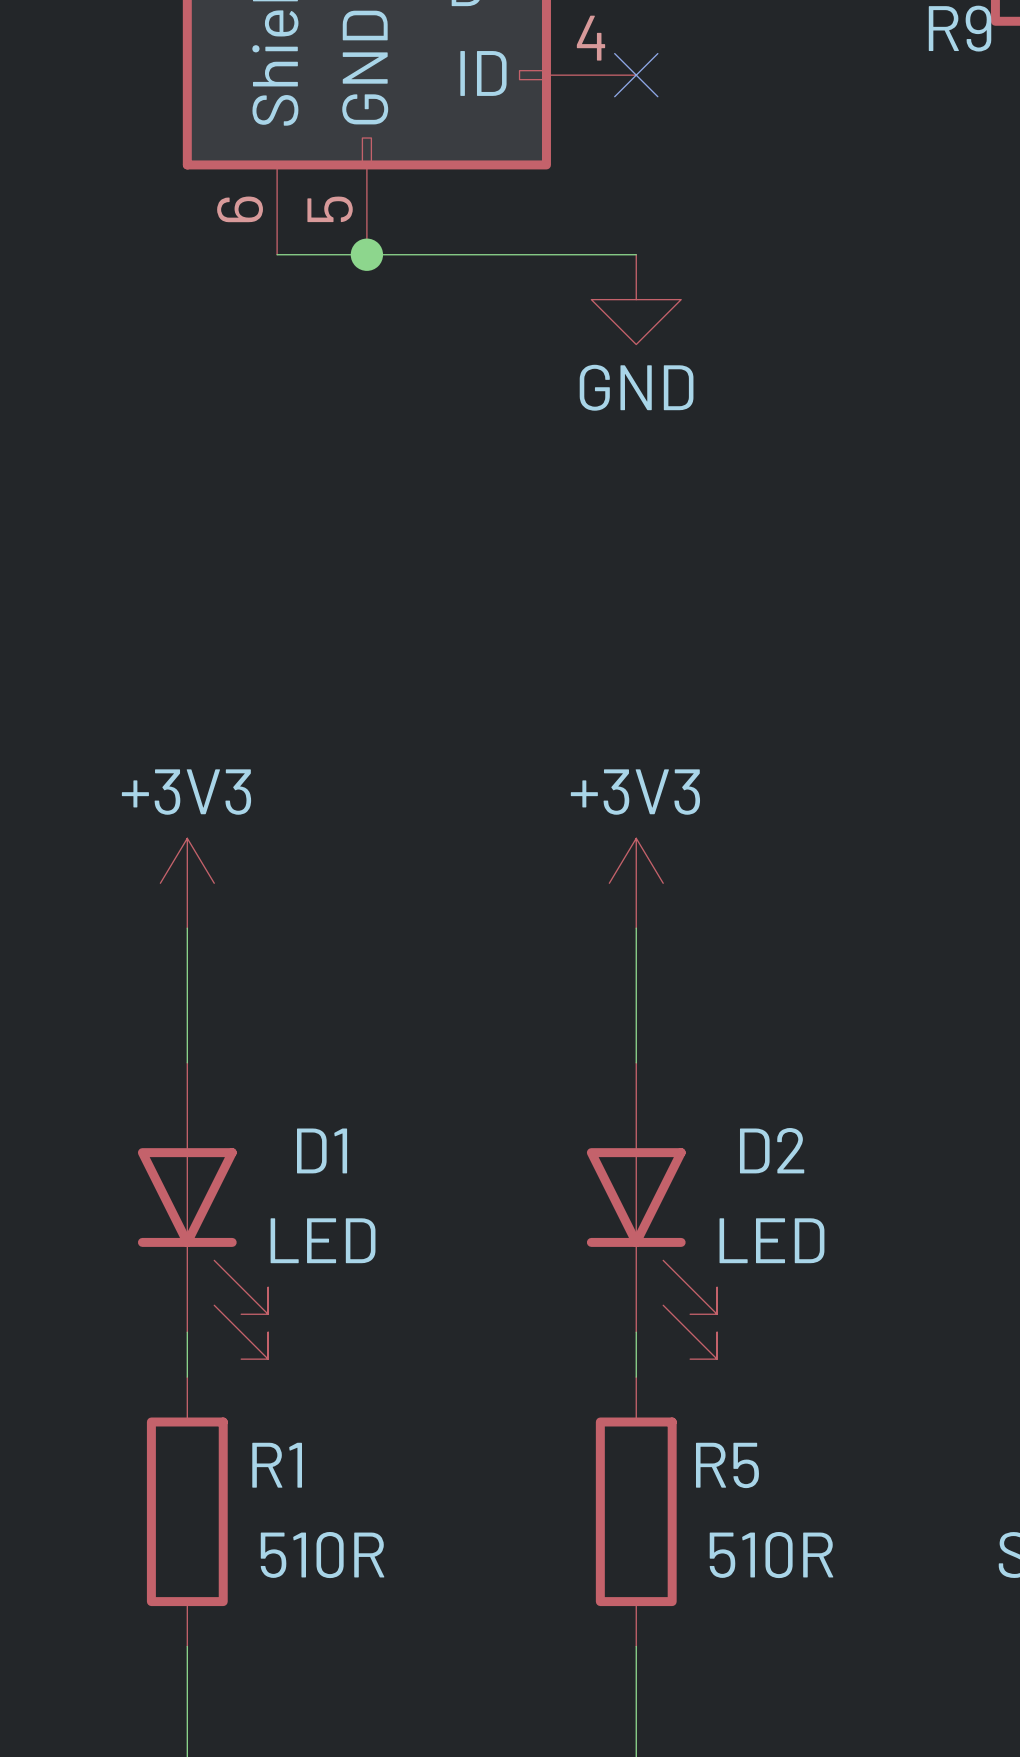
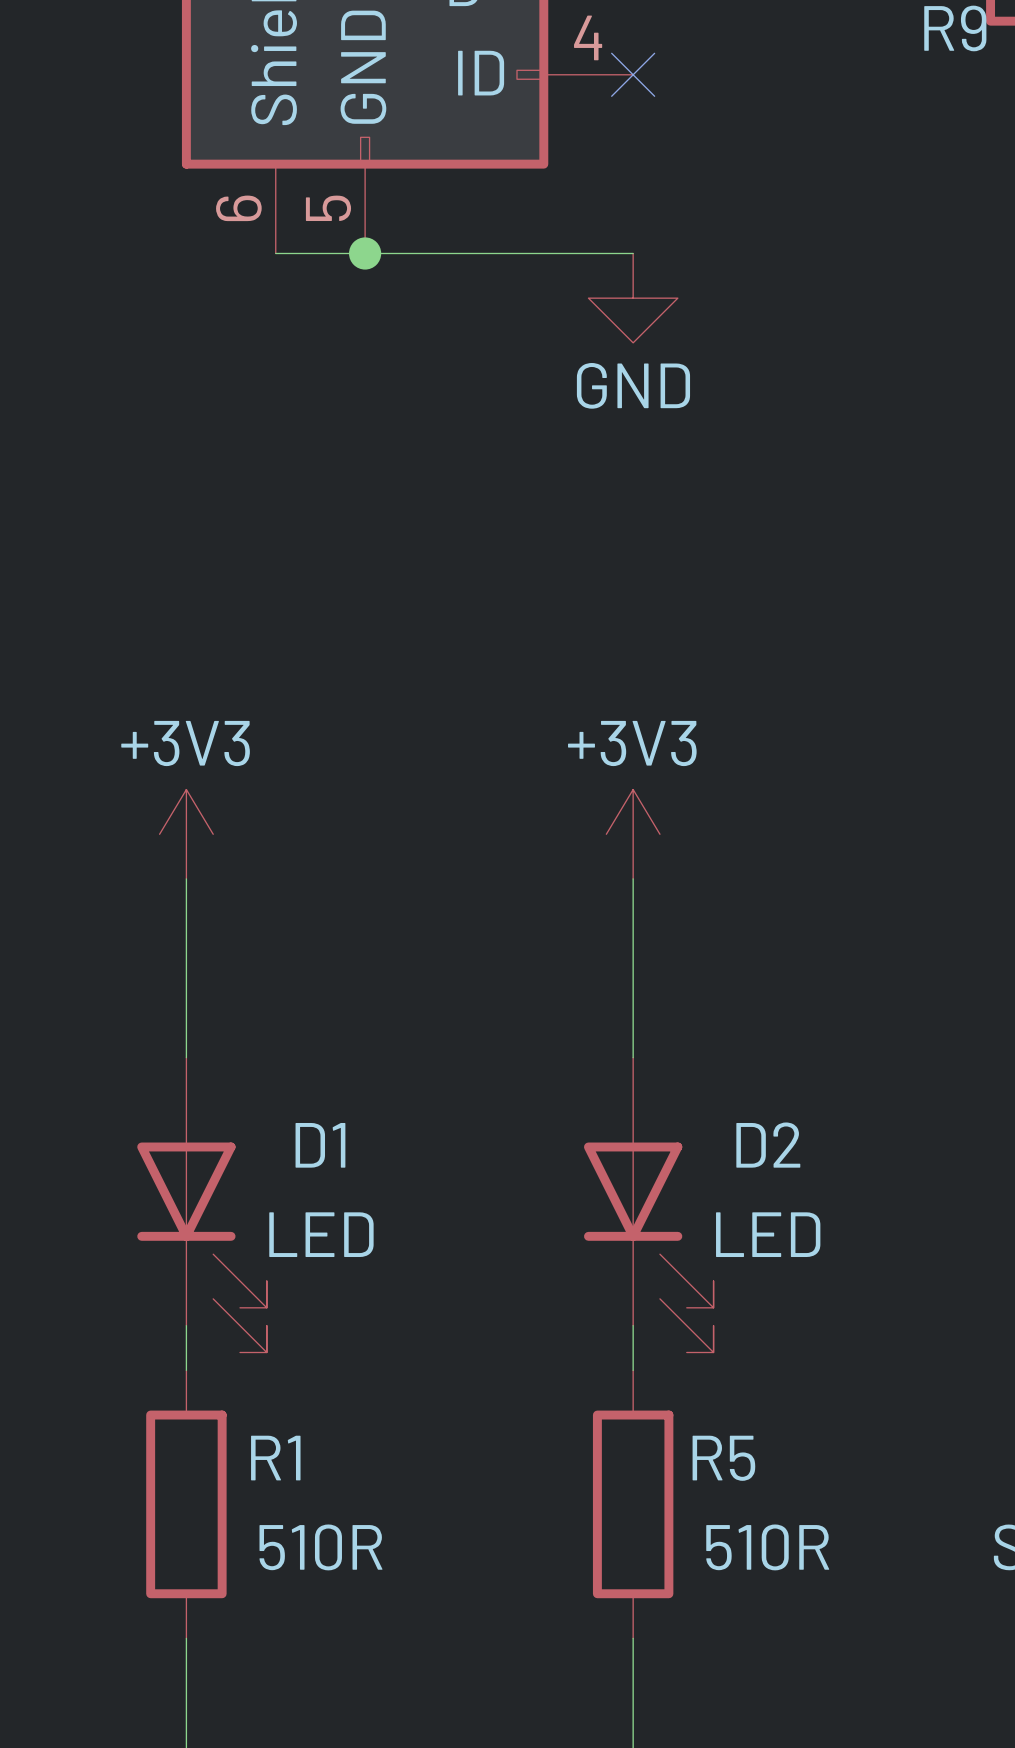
power symbol position: +3V3 (187, 883) -> +3V3 (186, 834)
power symbol position: +3V3 (636, 883) -> +3V3 (633, 834)

